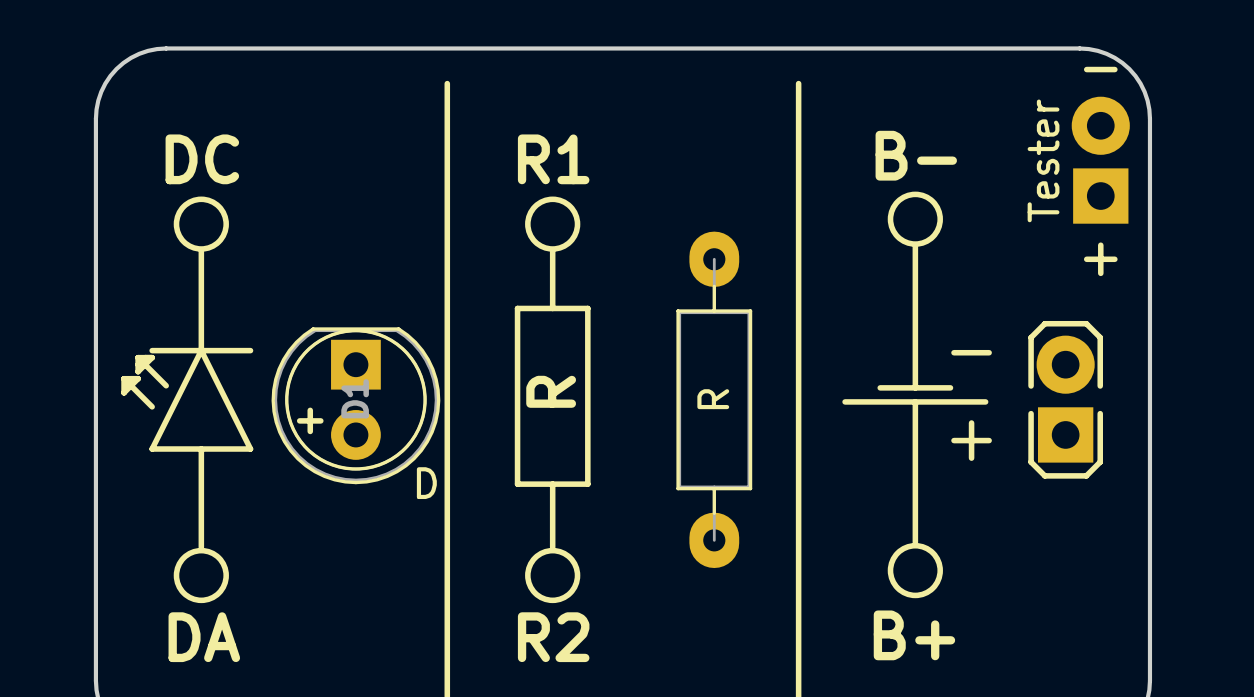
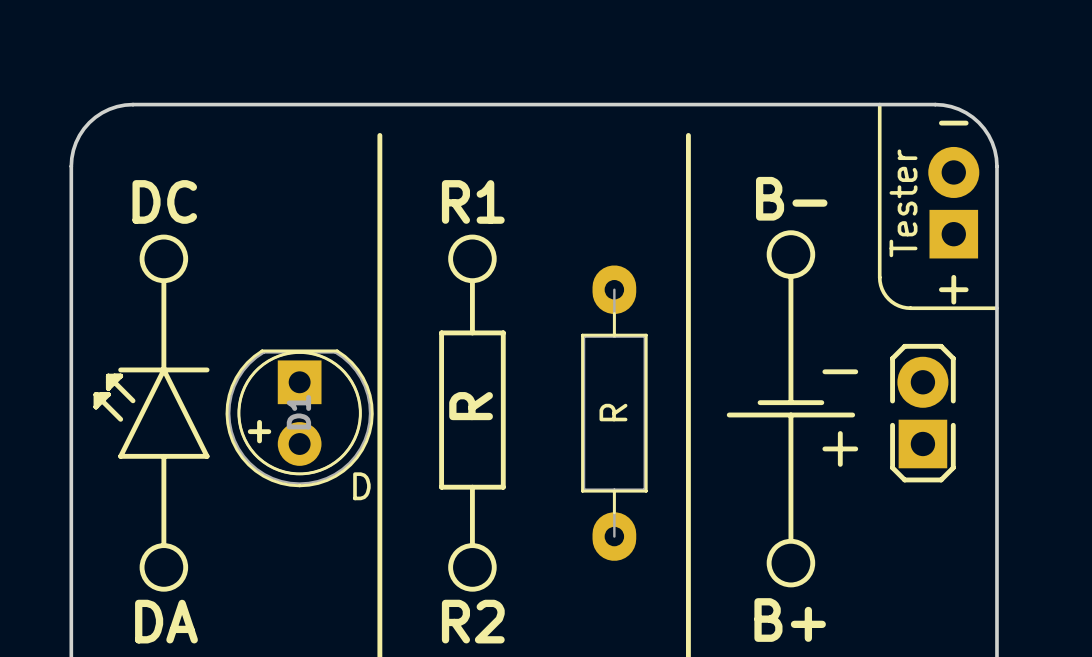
line: none -> (879, 104) (879, 277) (883, 292) (895, 304) (906, 307) (996, 308)

